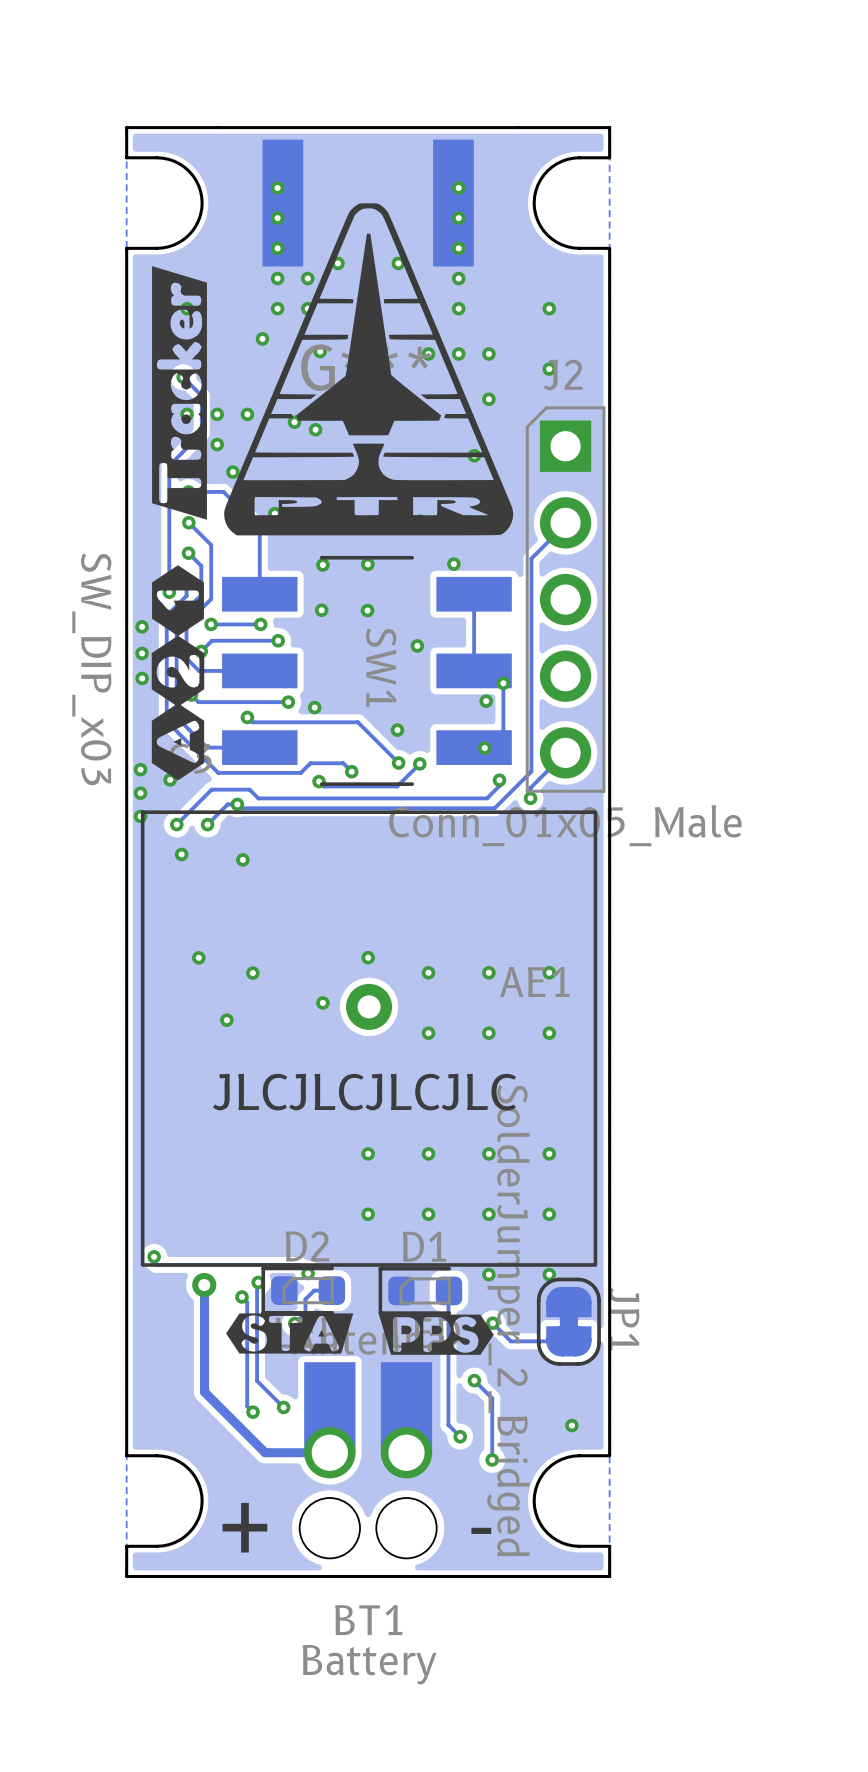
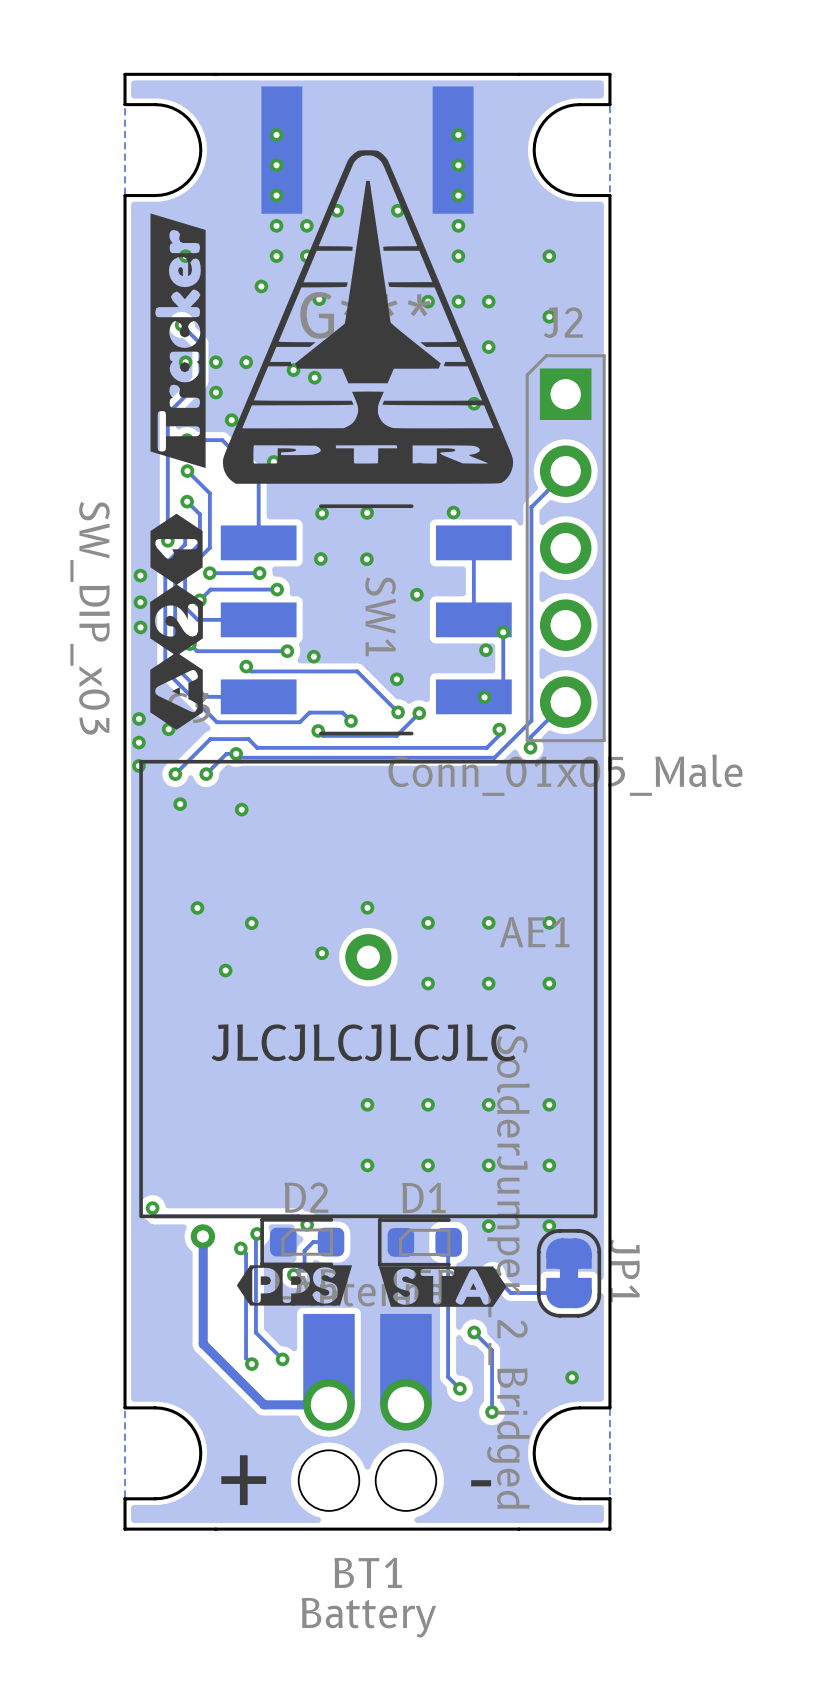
drawing shape: [226, 1313, 354, 1354] -> [236, 1265, 353, 1306]
drawing shape: [378, 1314, 494, 1355] -> [378, 1266, 507, 1307]

